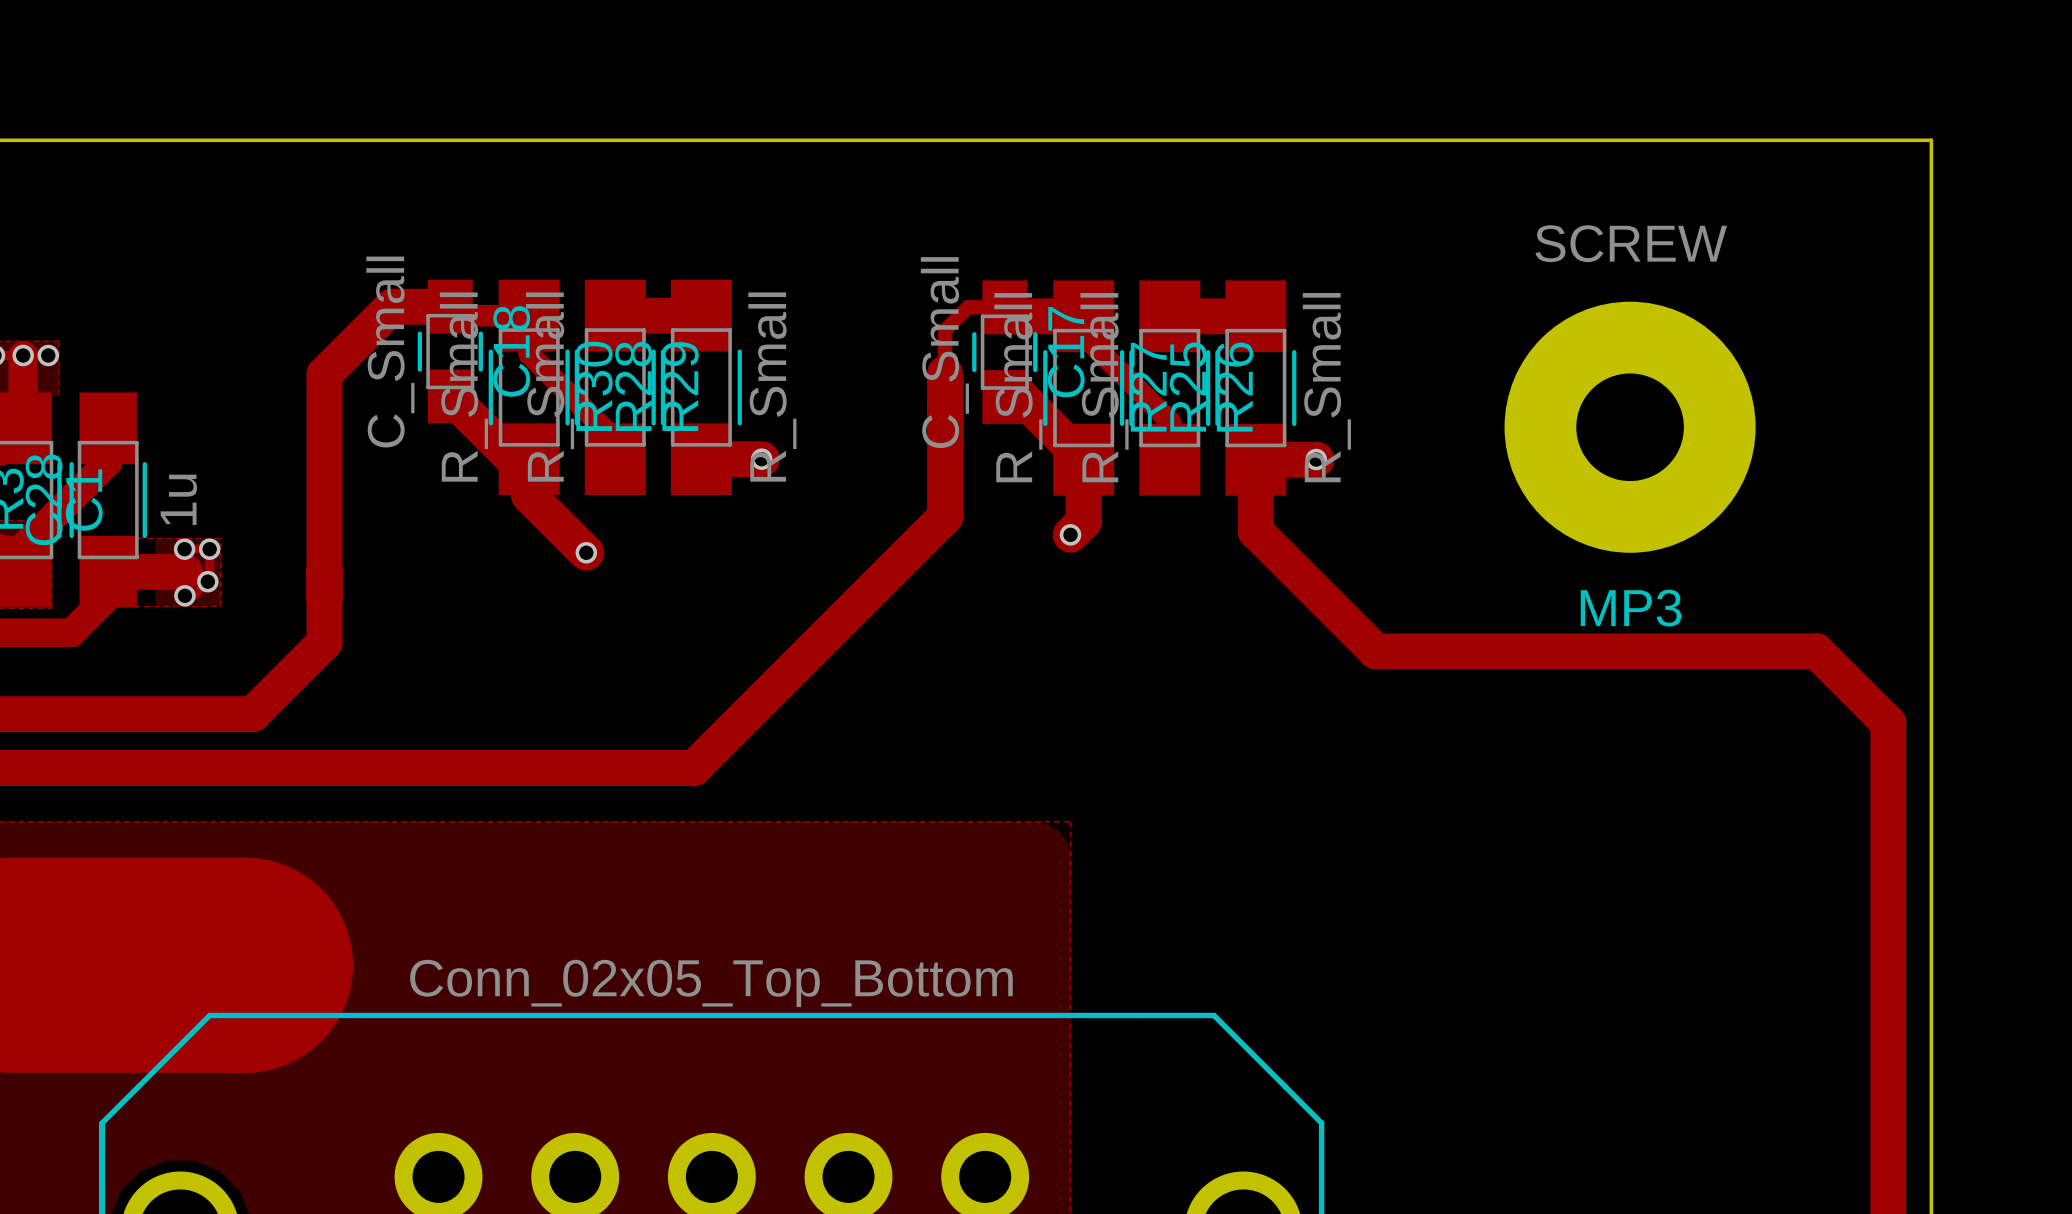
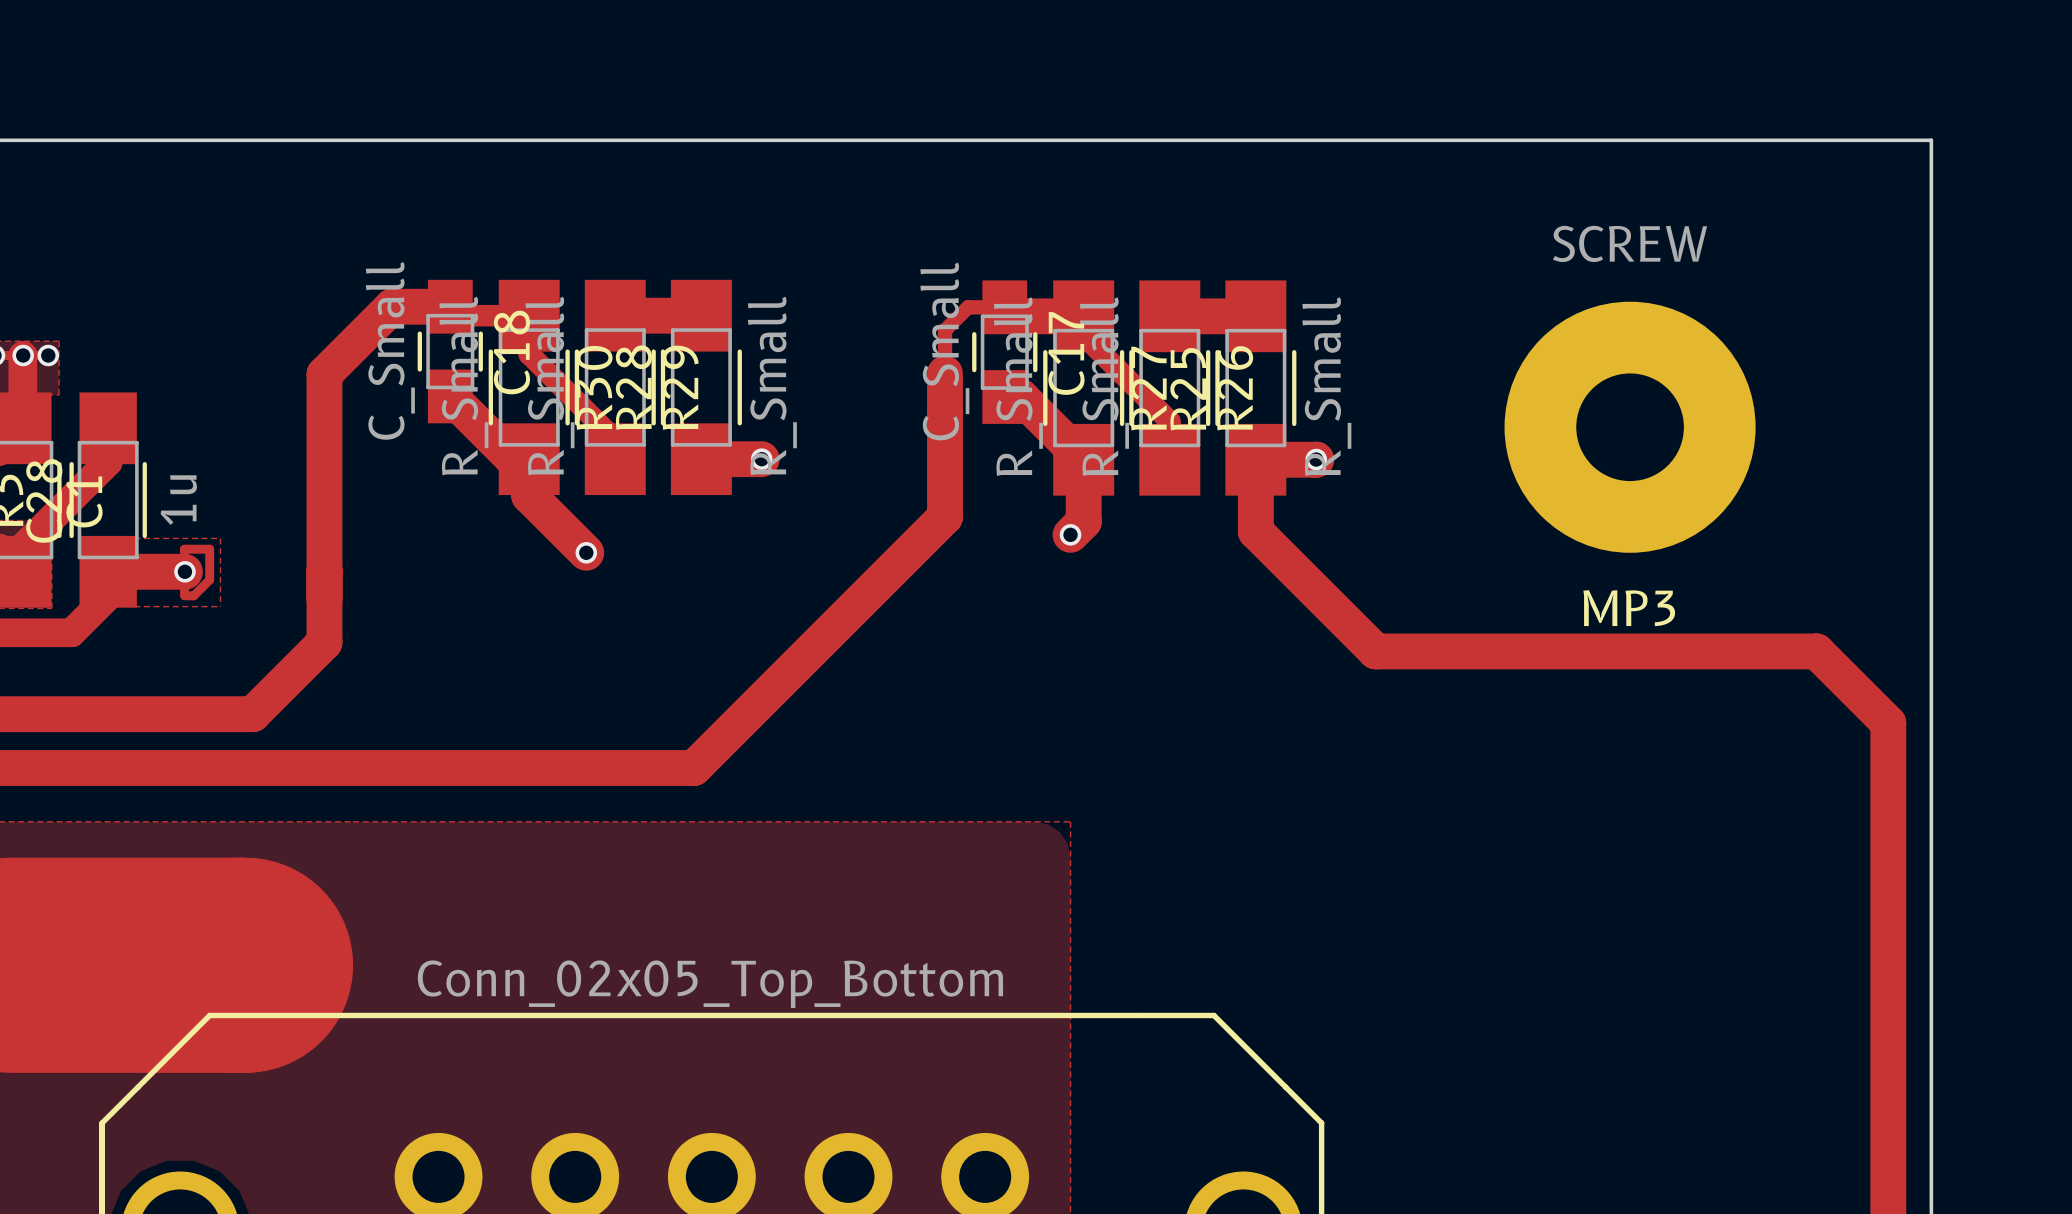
via: (184, 549) -> none
via: (209, 549) -> none
via: none -> (184, 571)
via: (207, 581) -> none
via: (184, 595) -> none

